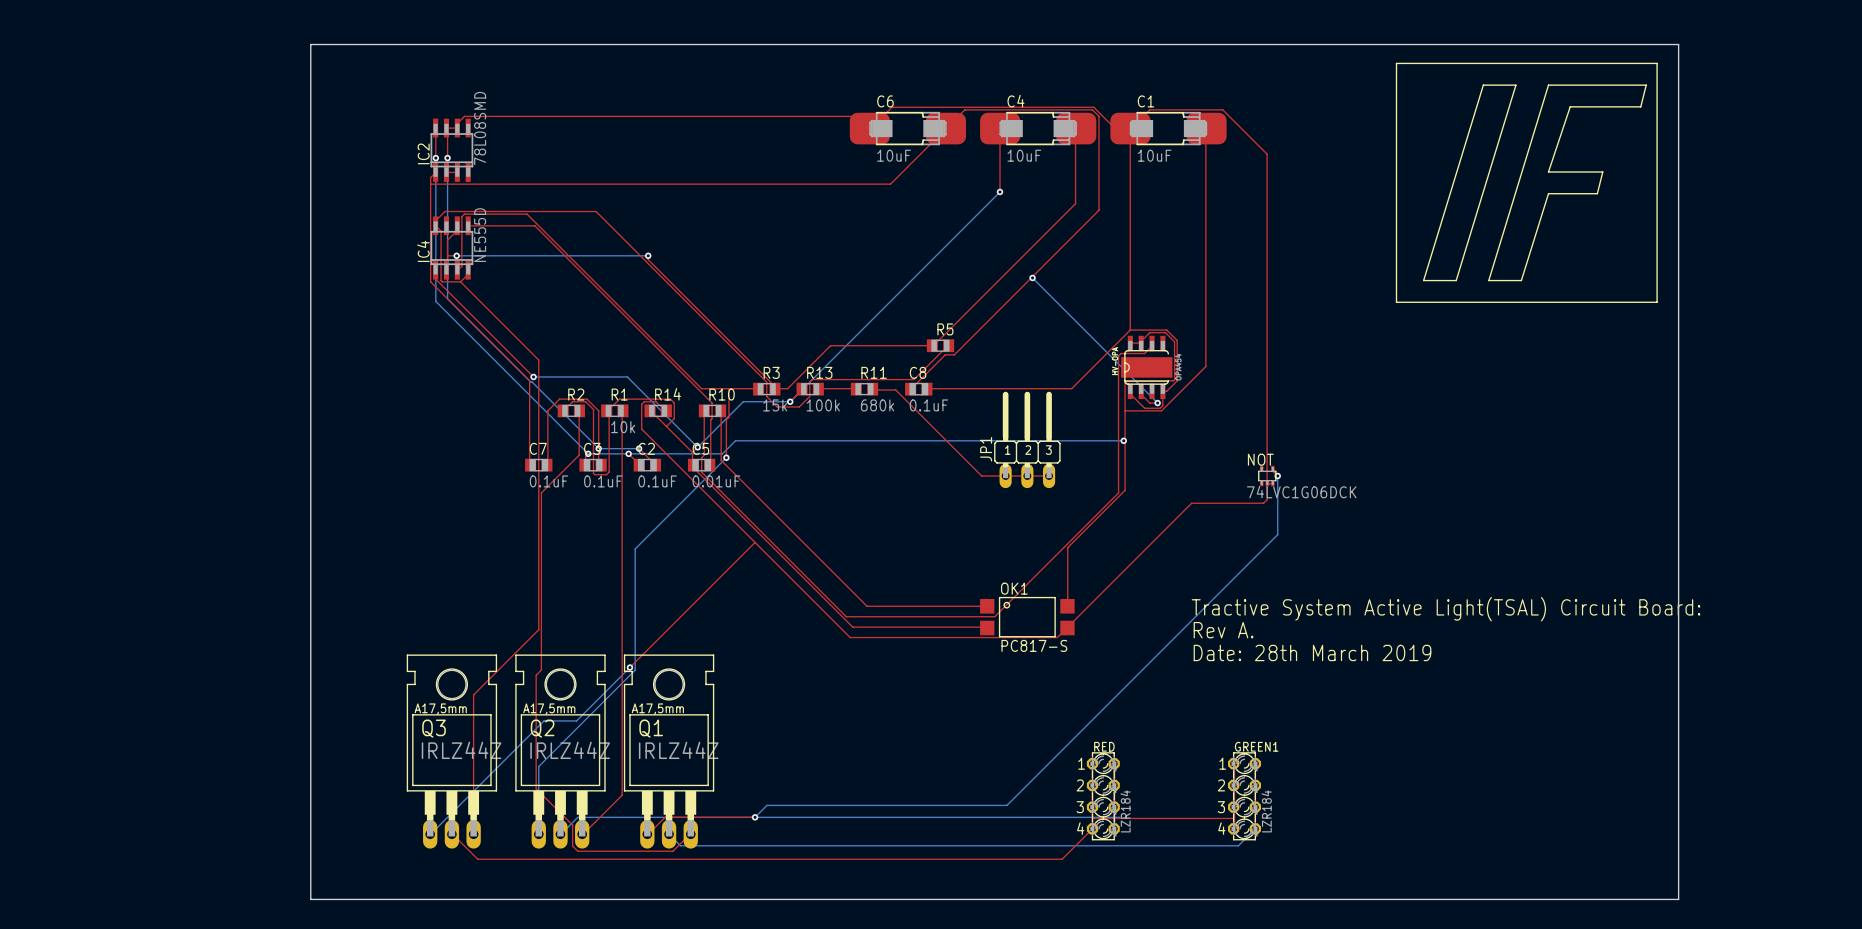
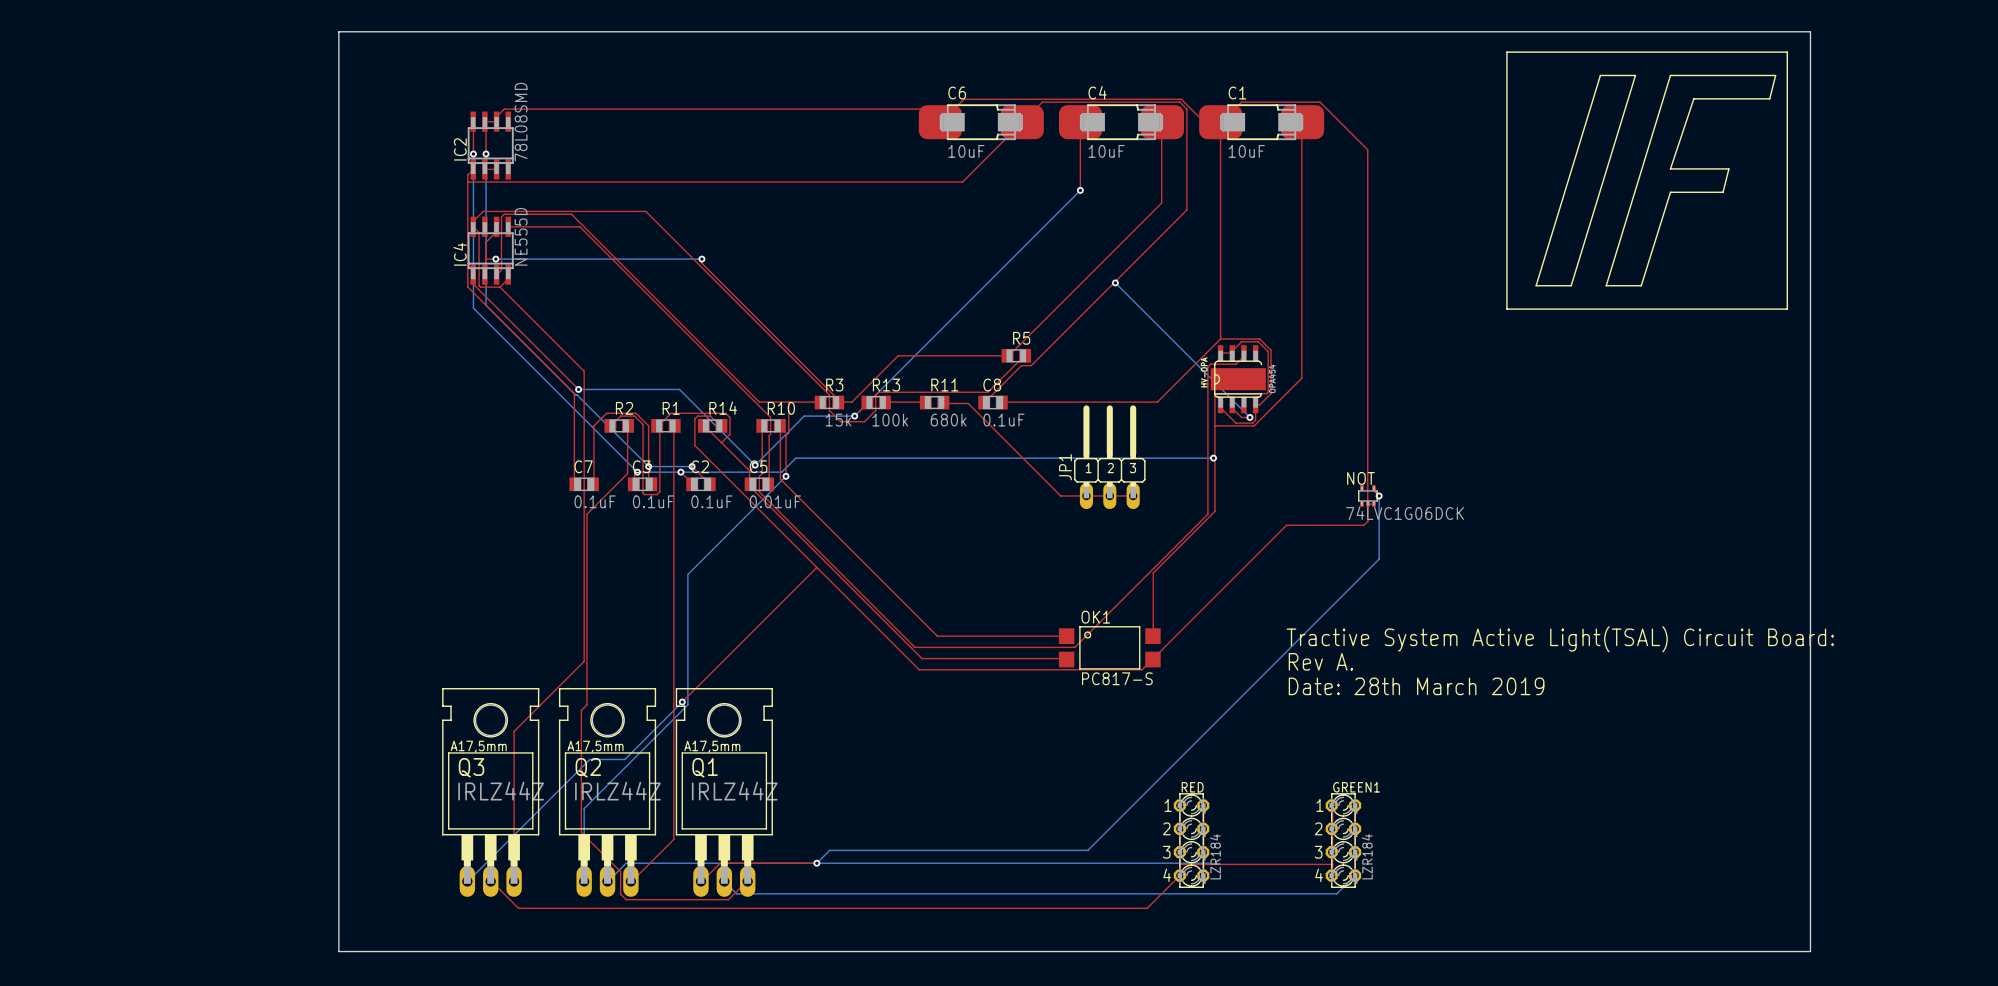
R1 value: 10k (623, 427) -> none

